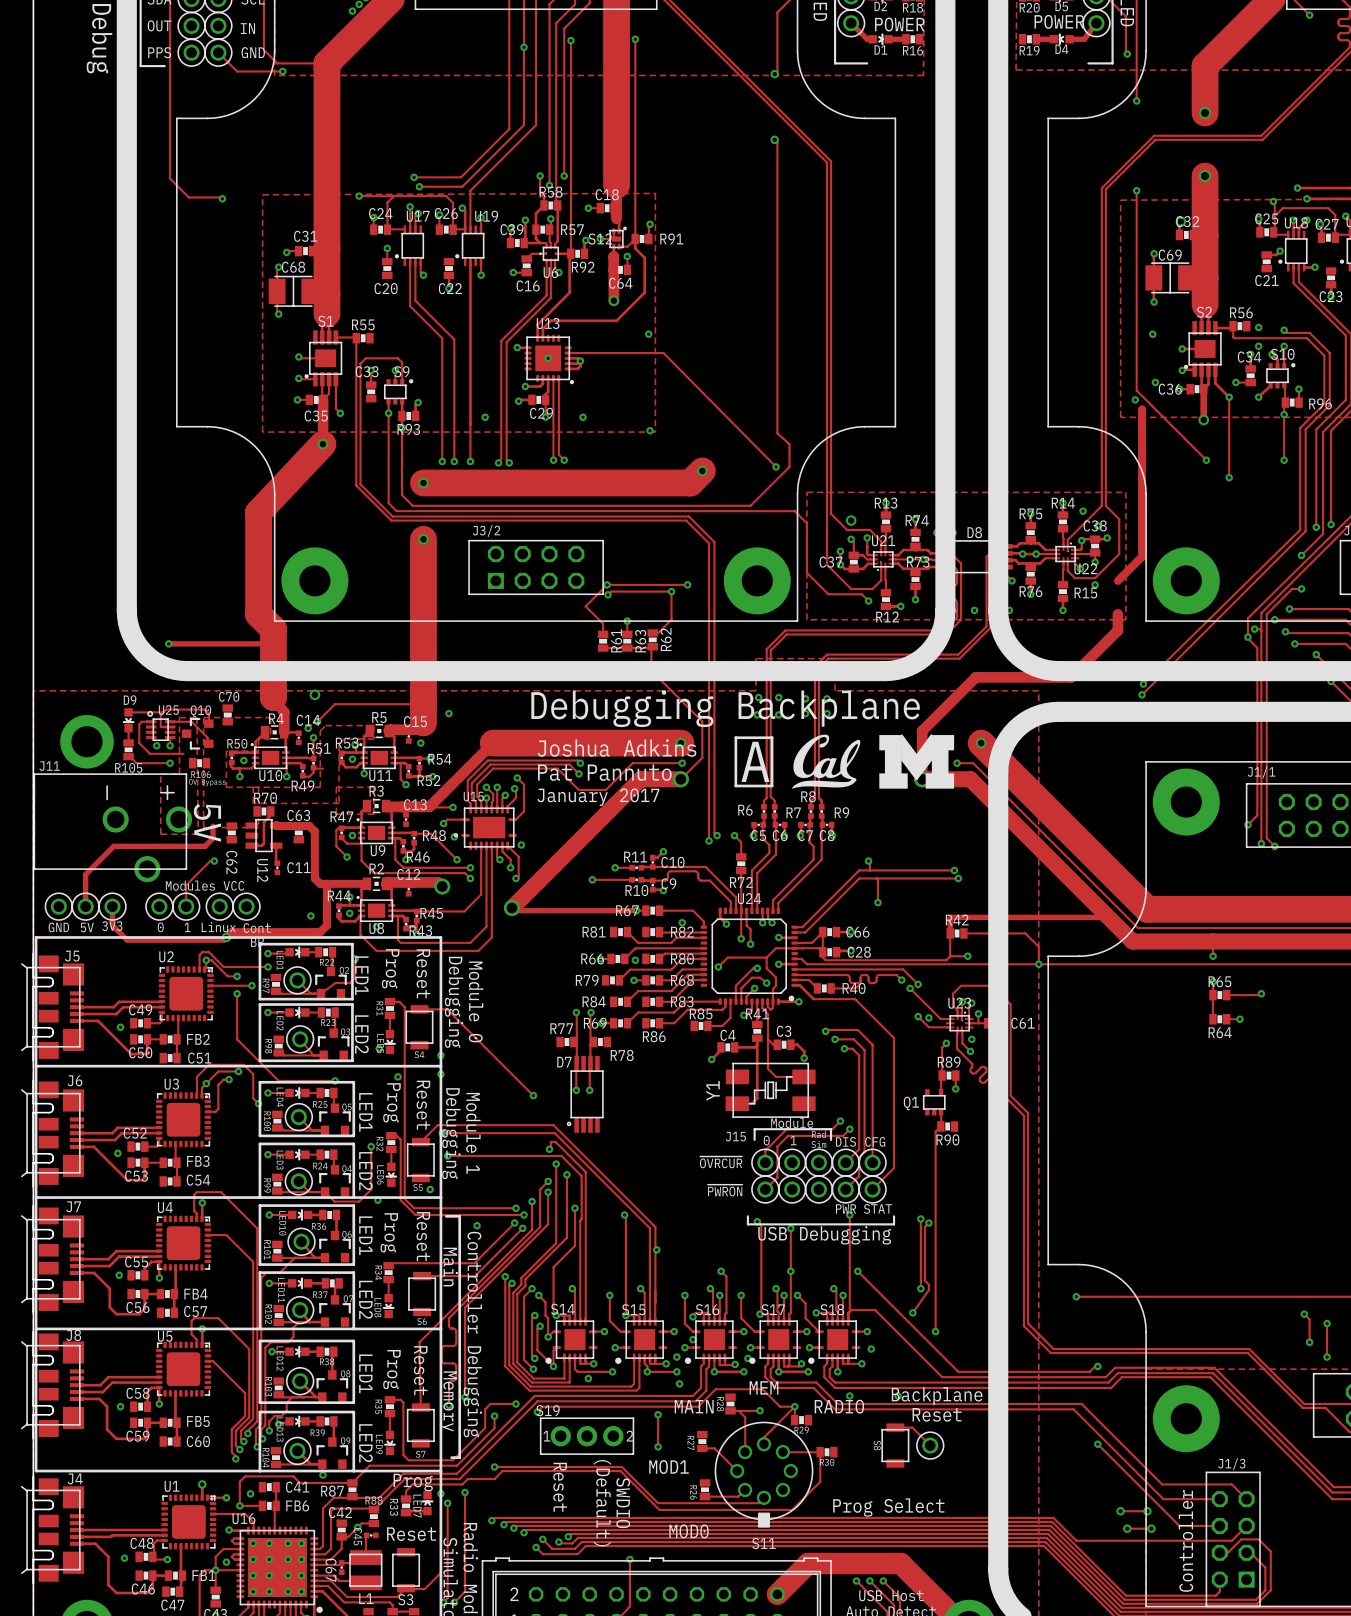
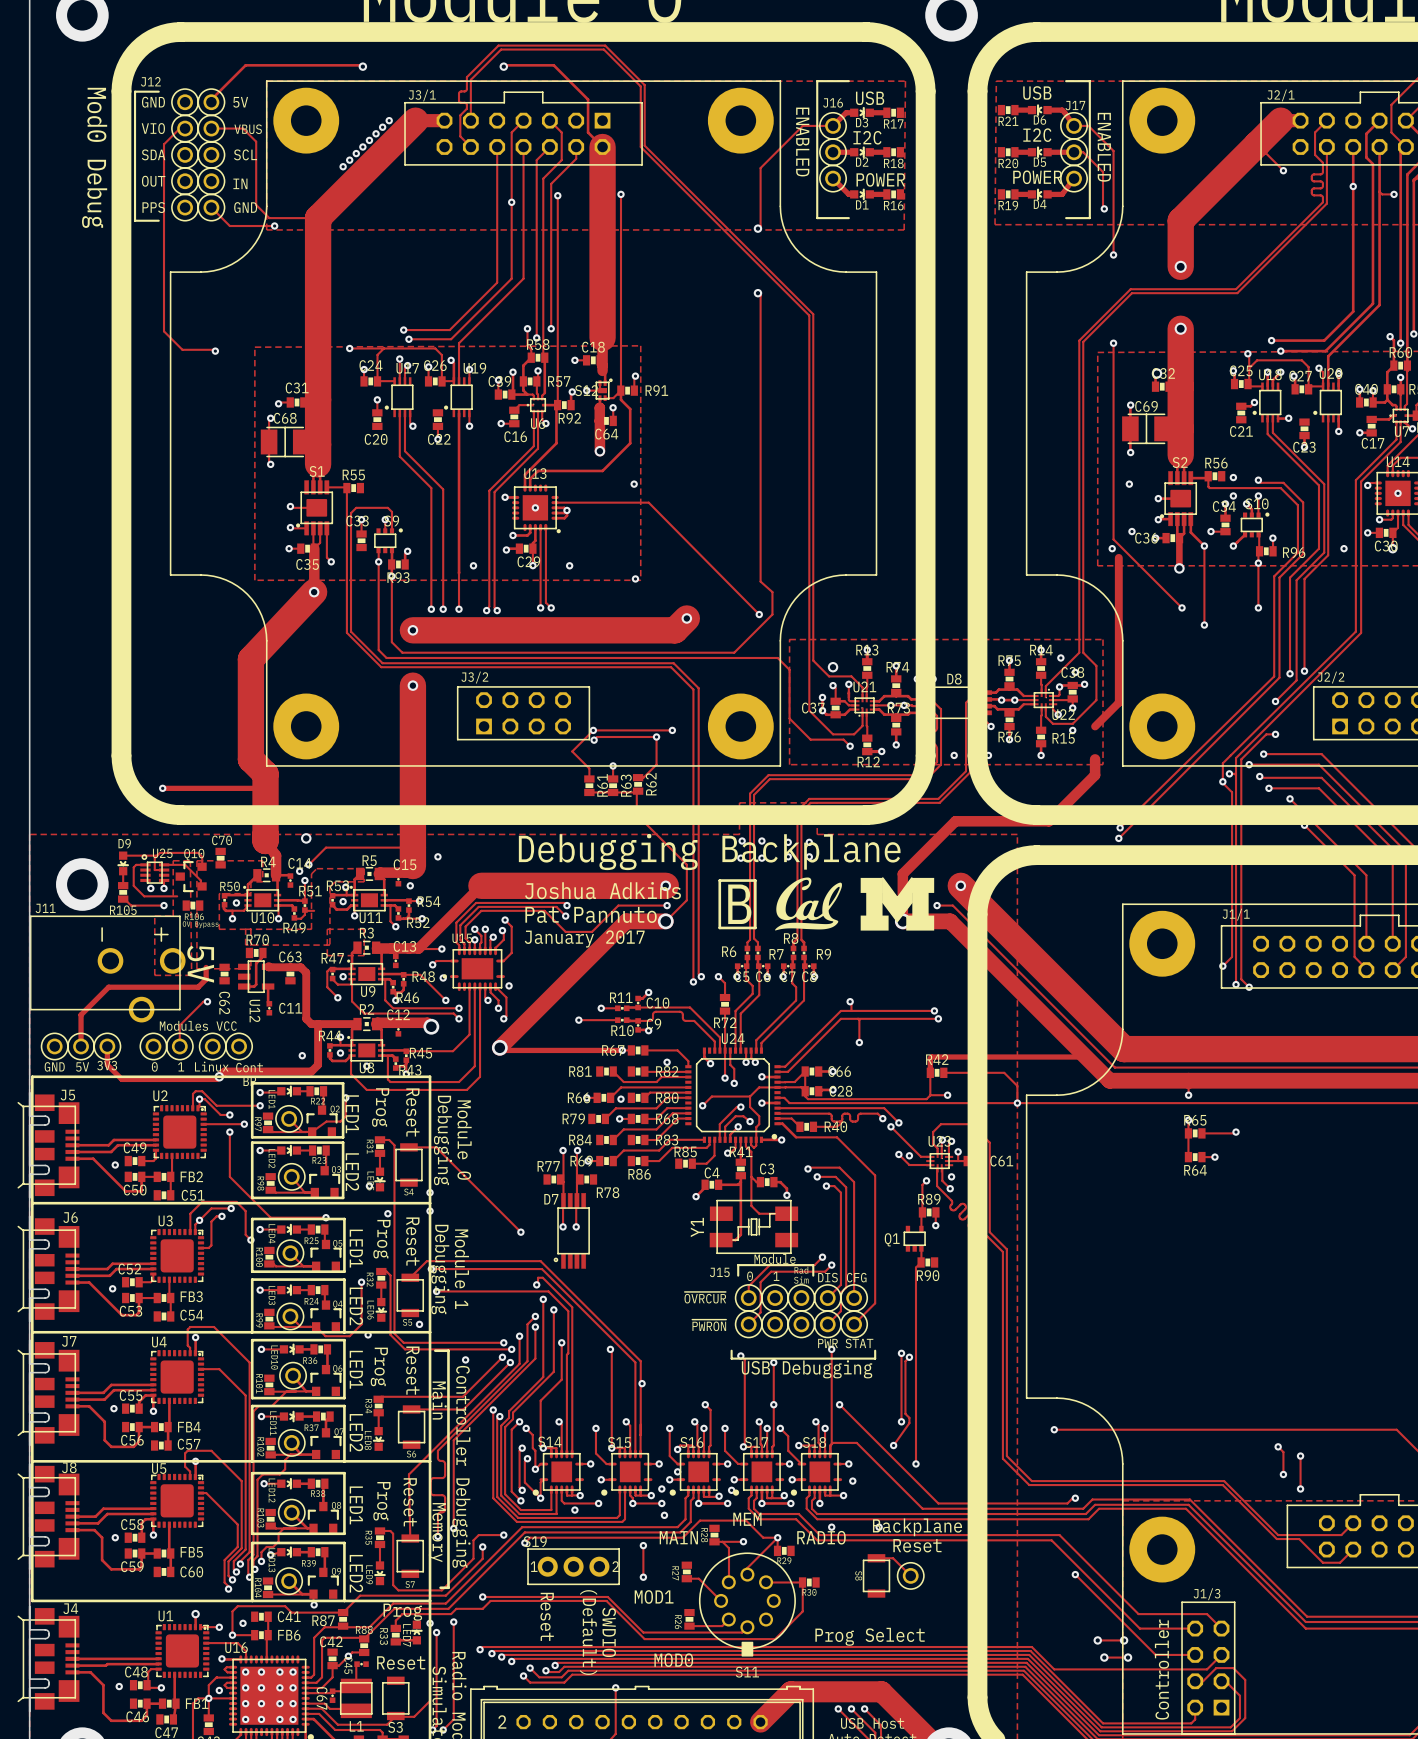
text: A (755, 761) -> B (739, 904)

